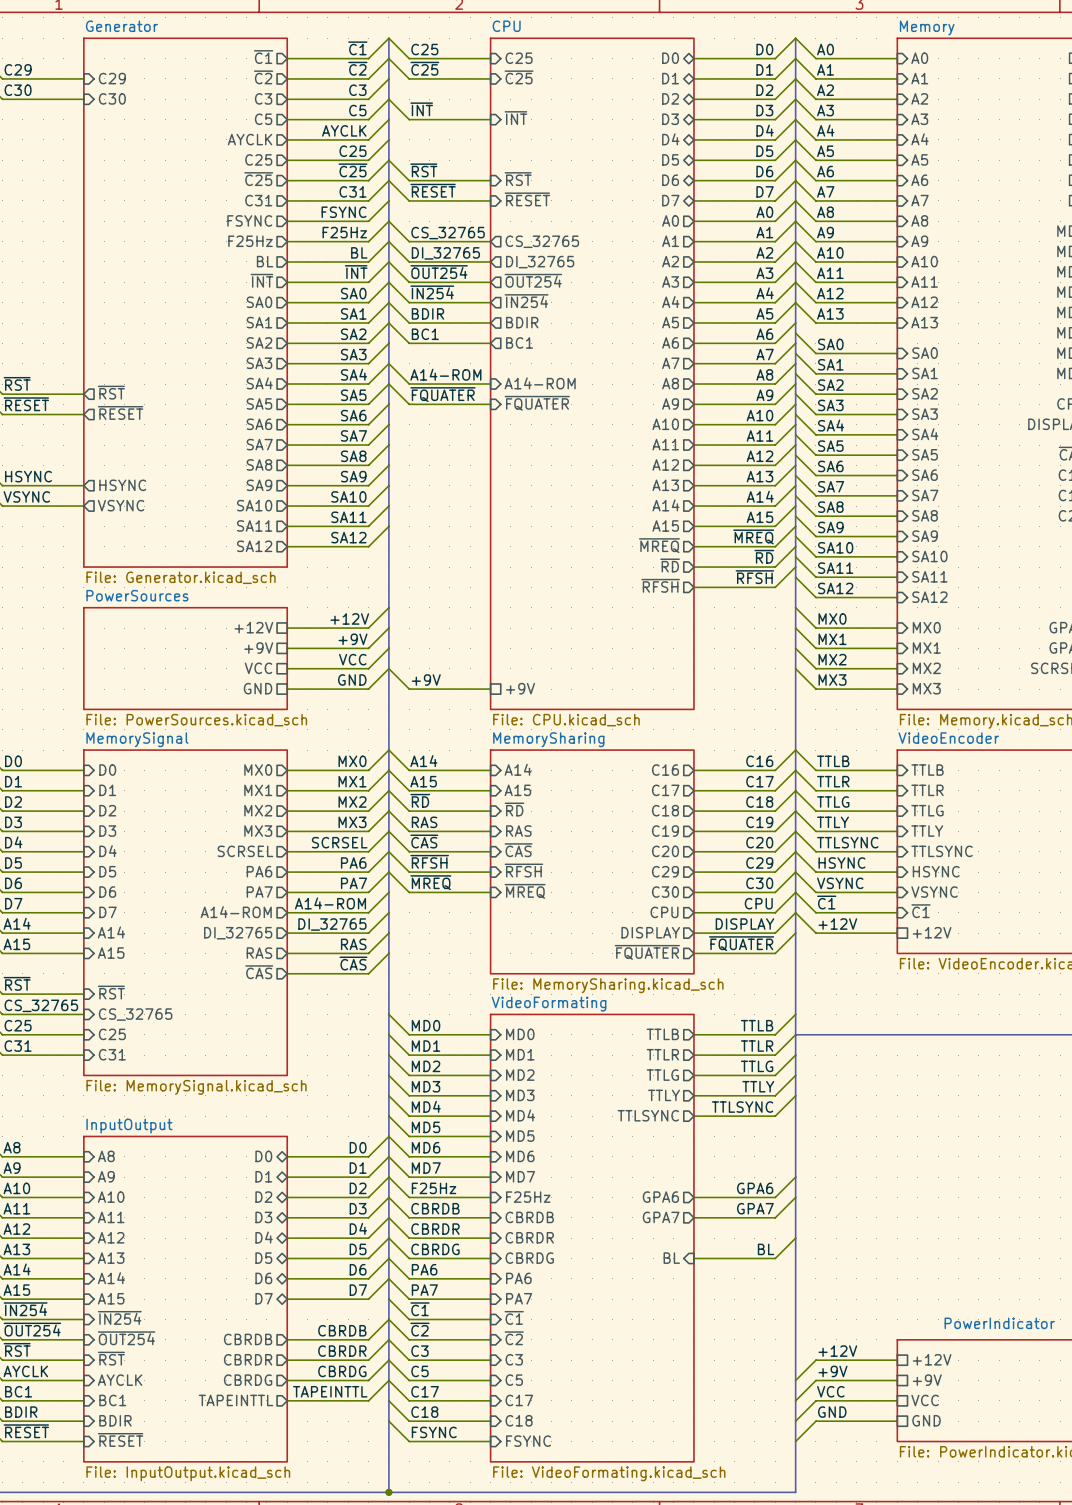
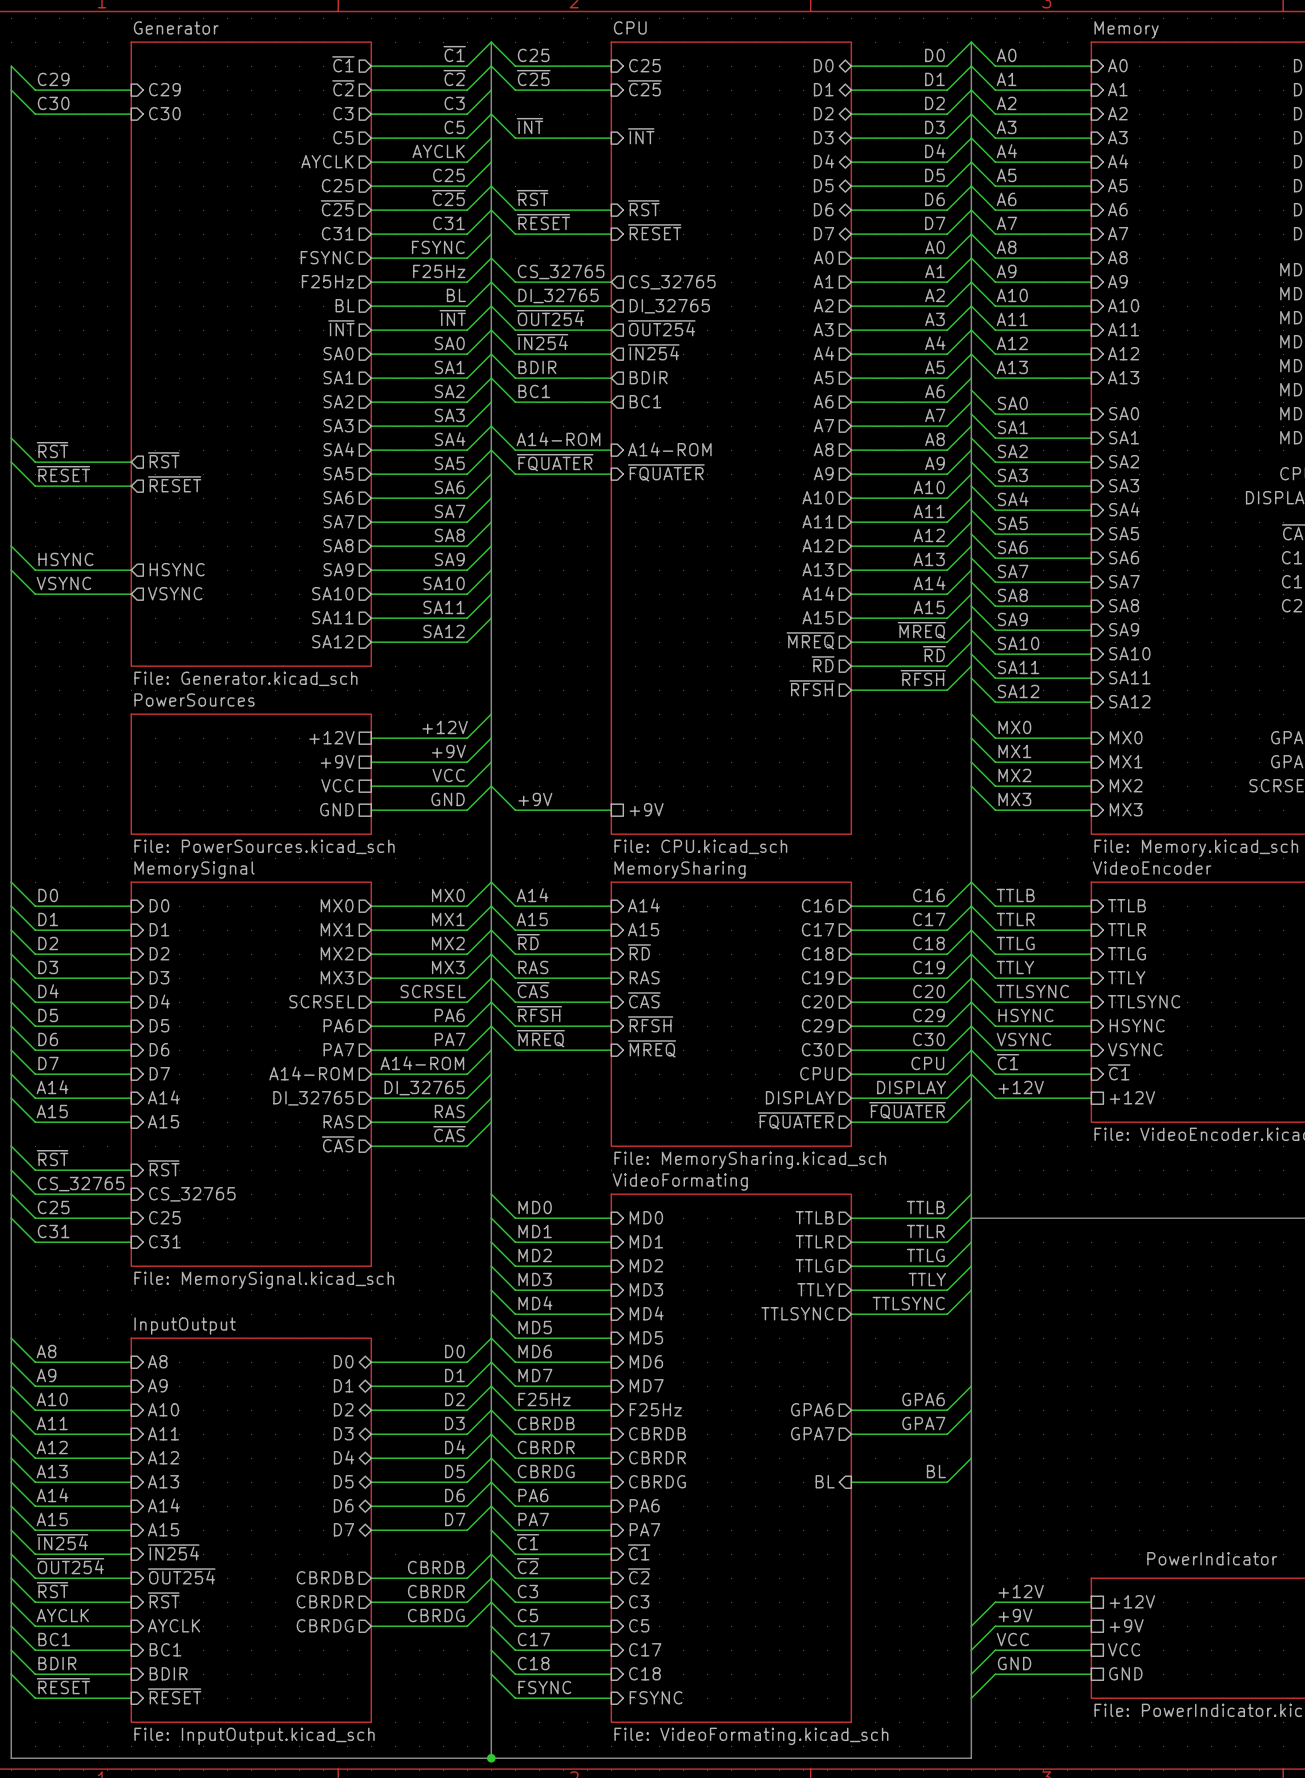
wire: (388, 1380) (368, 1400) (287, 1400) -> none
label: TAPEINTTL (330, 1391) -> none
sheet pin: TAPEINTTL (235, 1400) -> none

